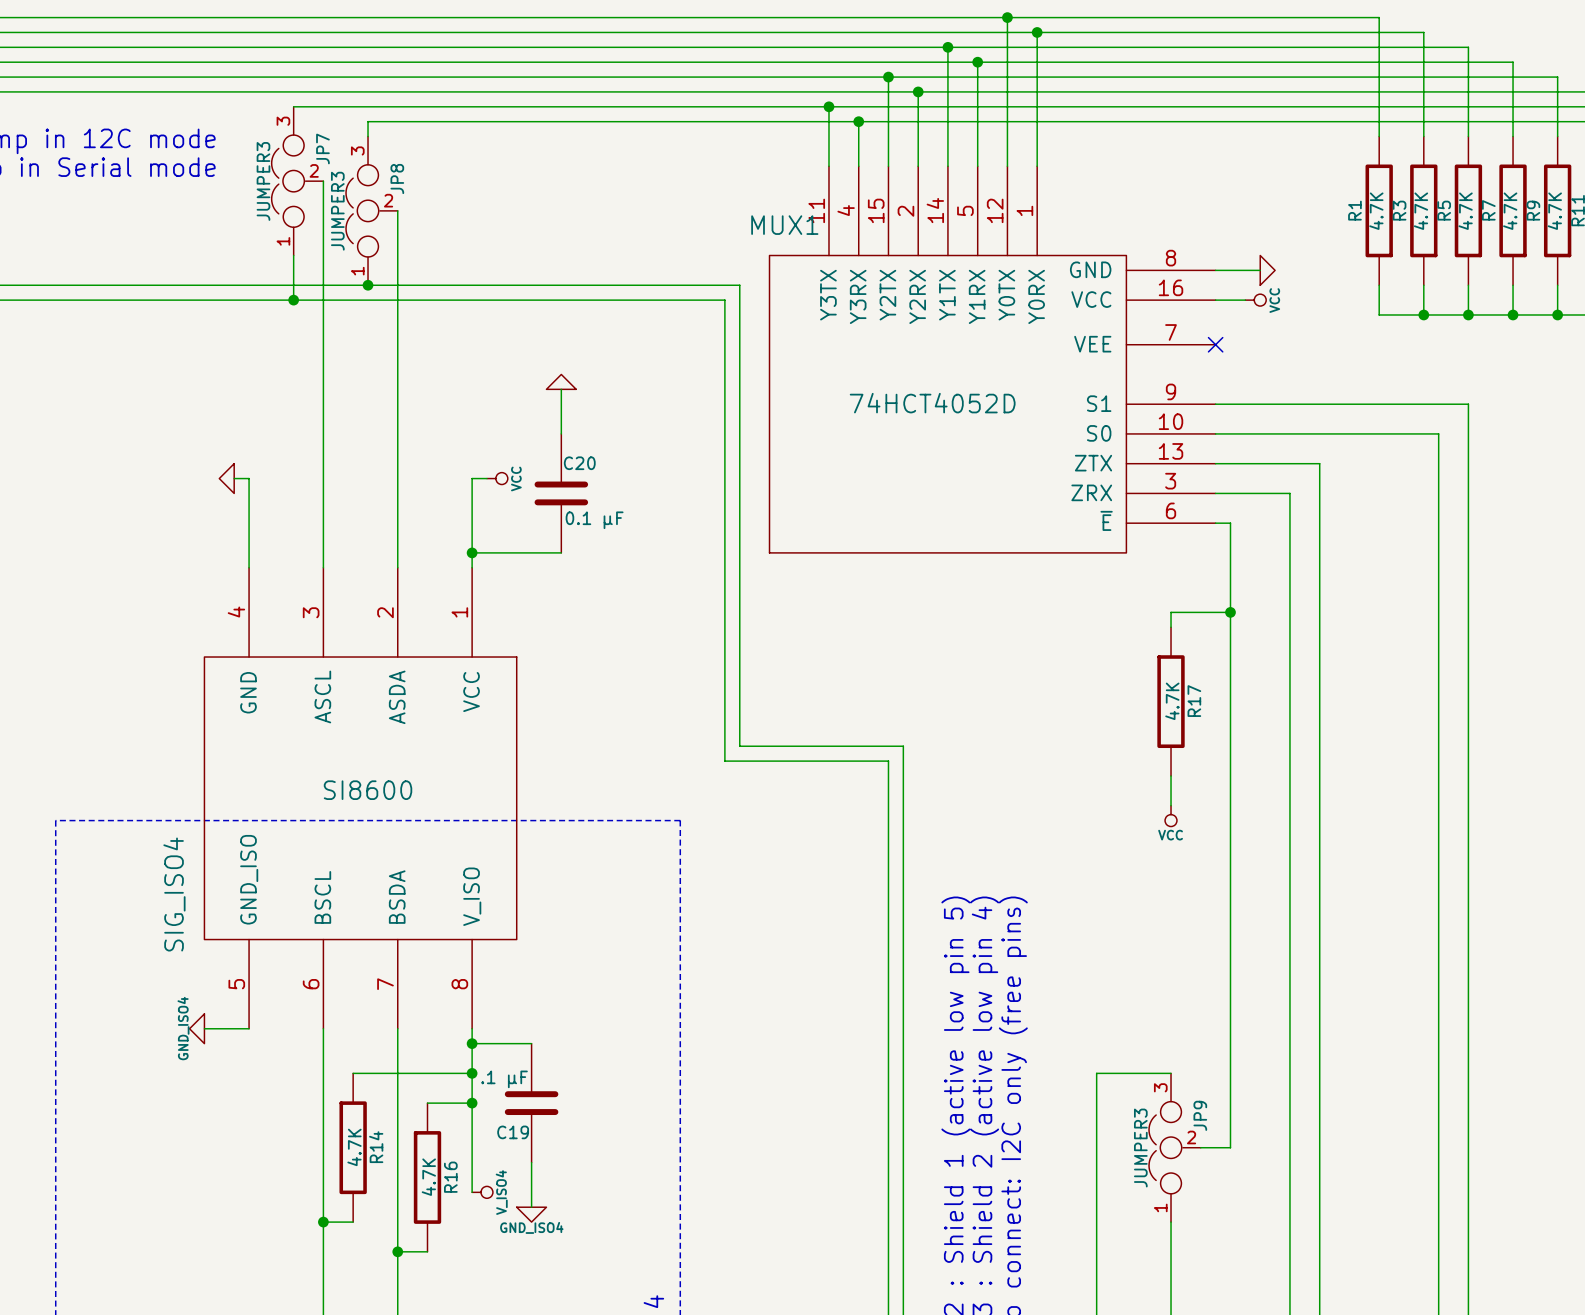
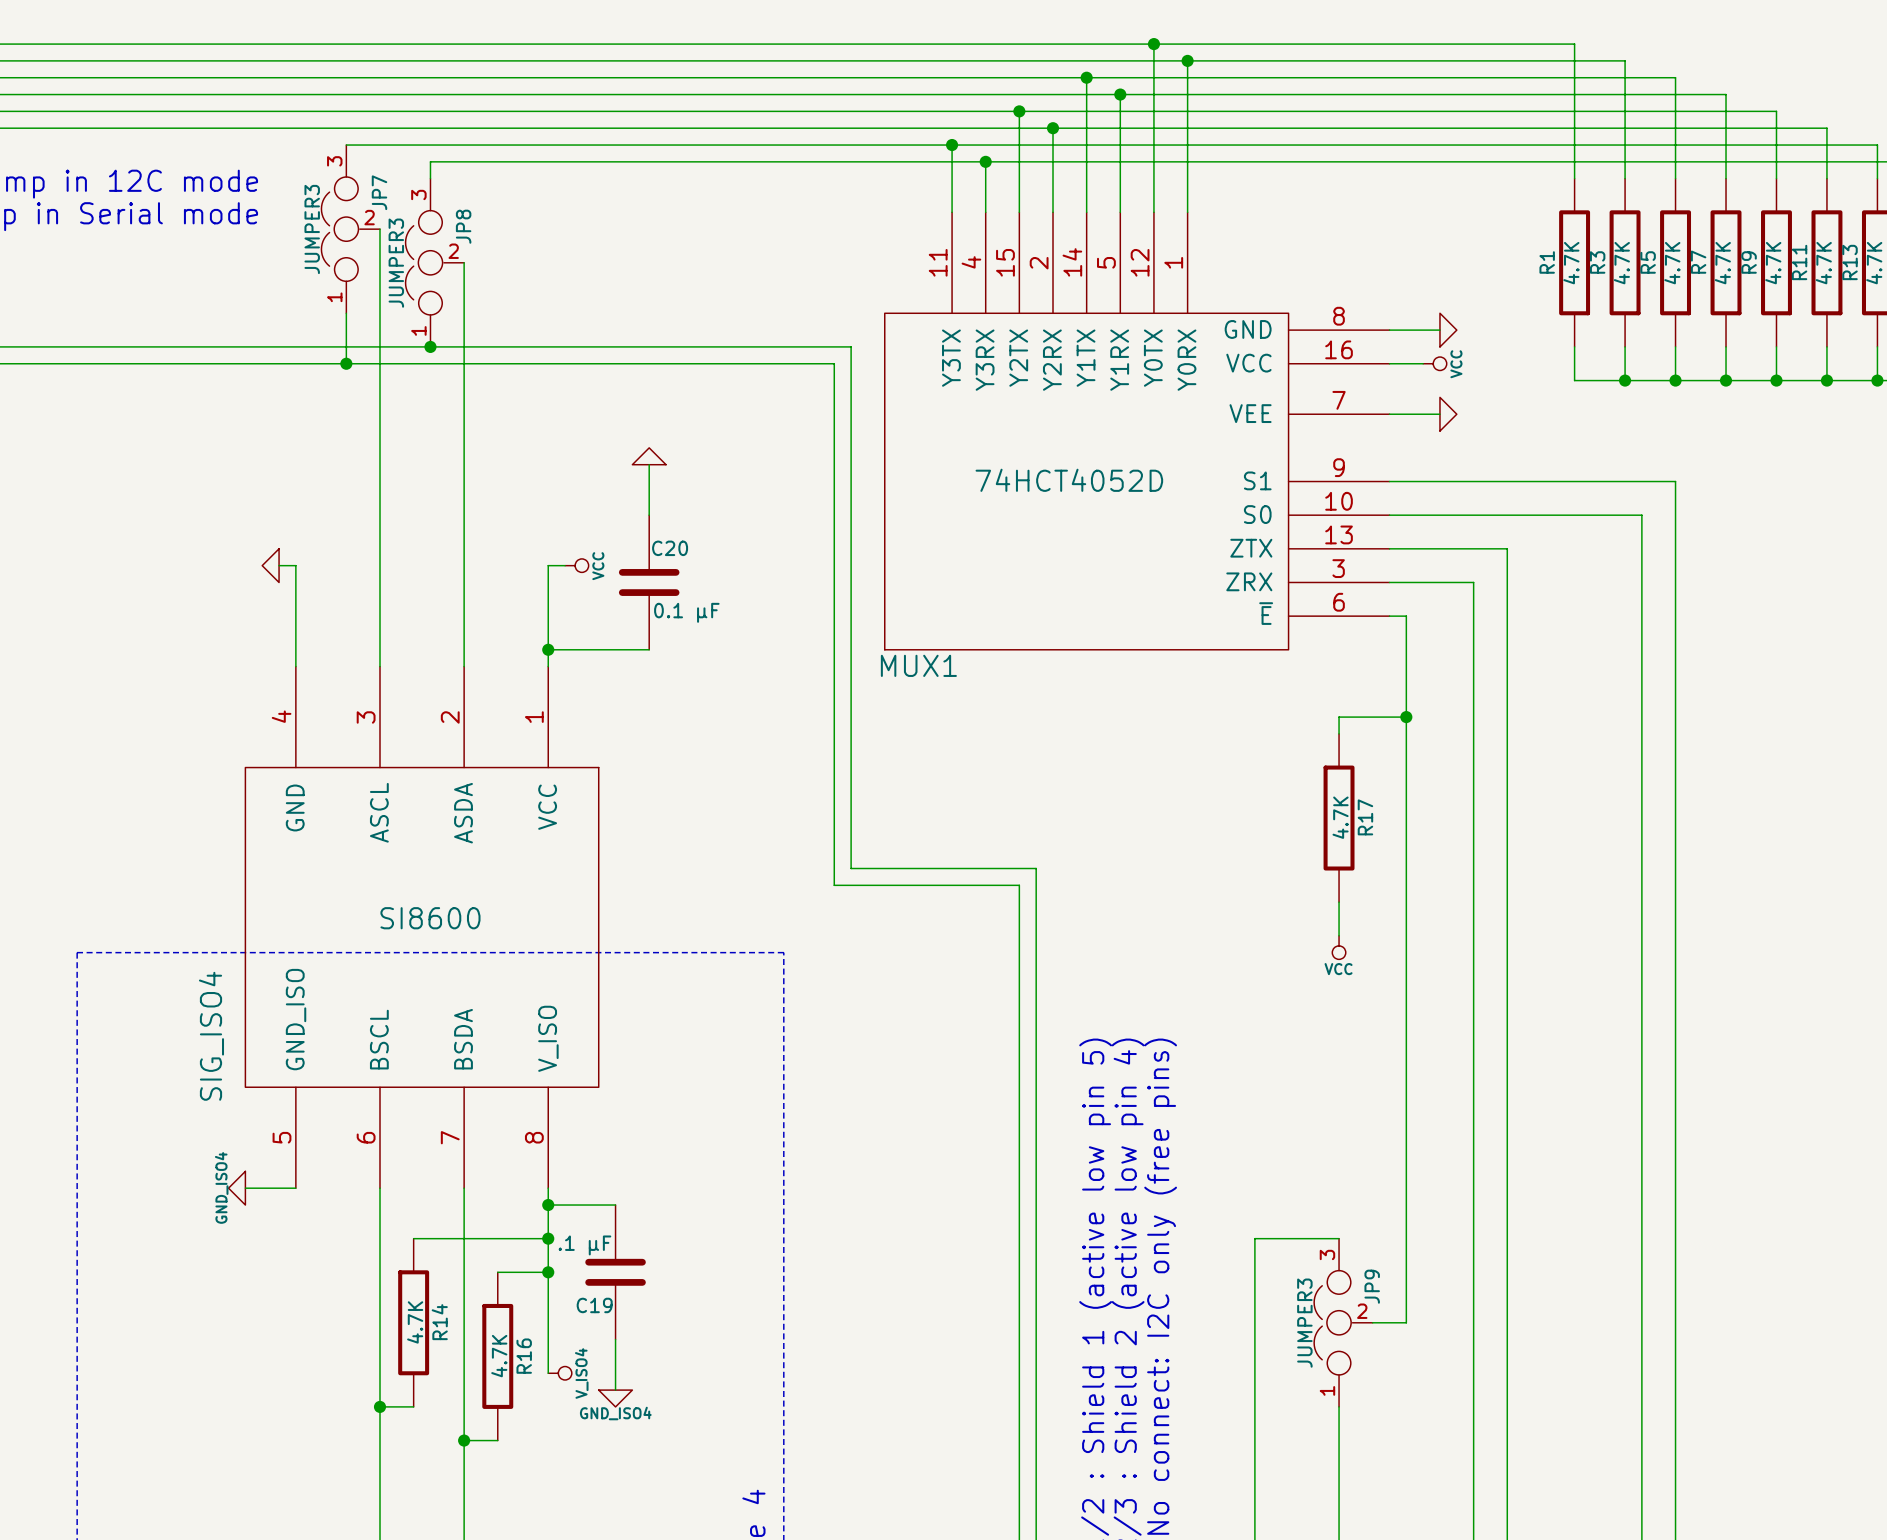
MUX1 name position: MUX1 (784, 225) -> MUX1 (918, 665)
wire: none -> (1389, 414) (1439, 414)
no-connect mark: (1215, 344) -> none
power symbol: none -> (1448, 414)

